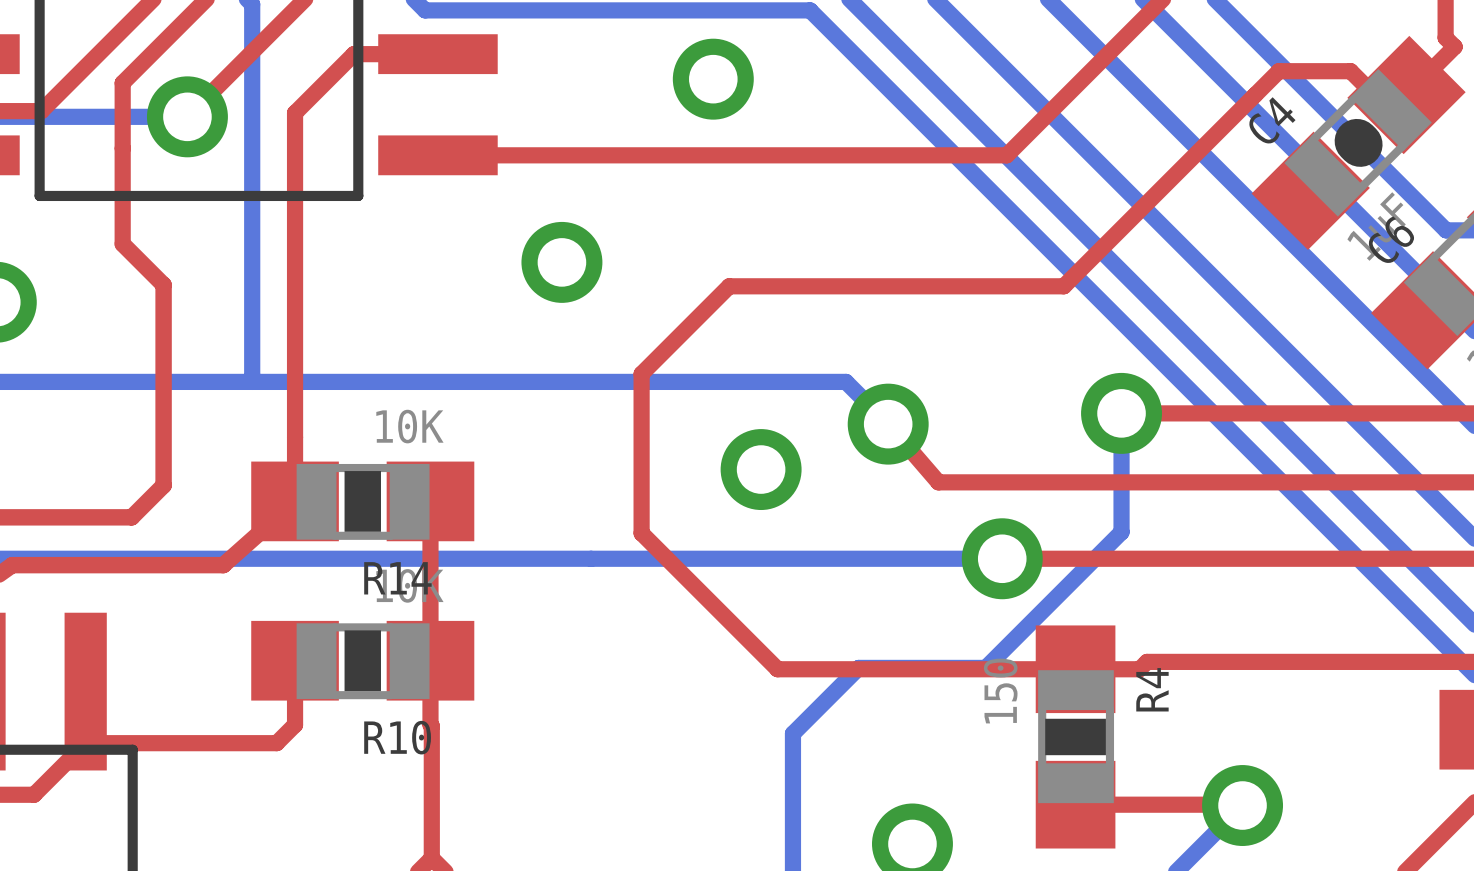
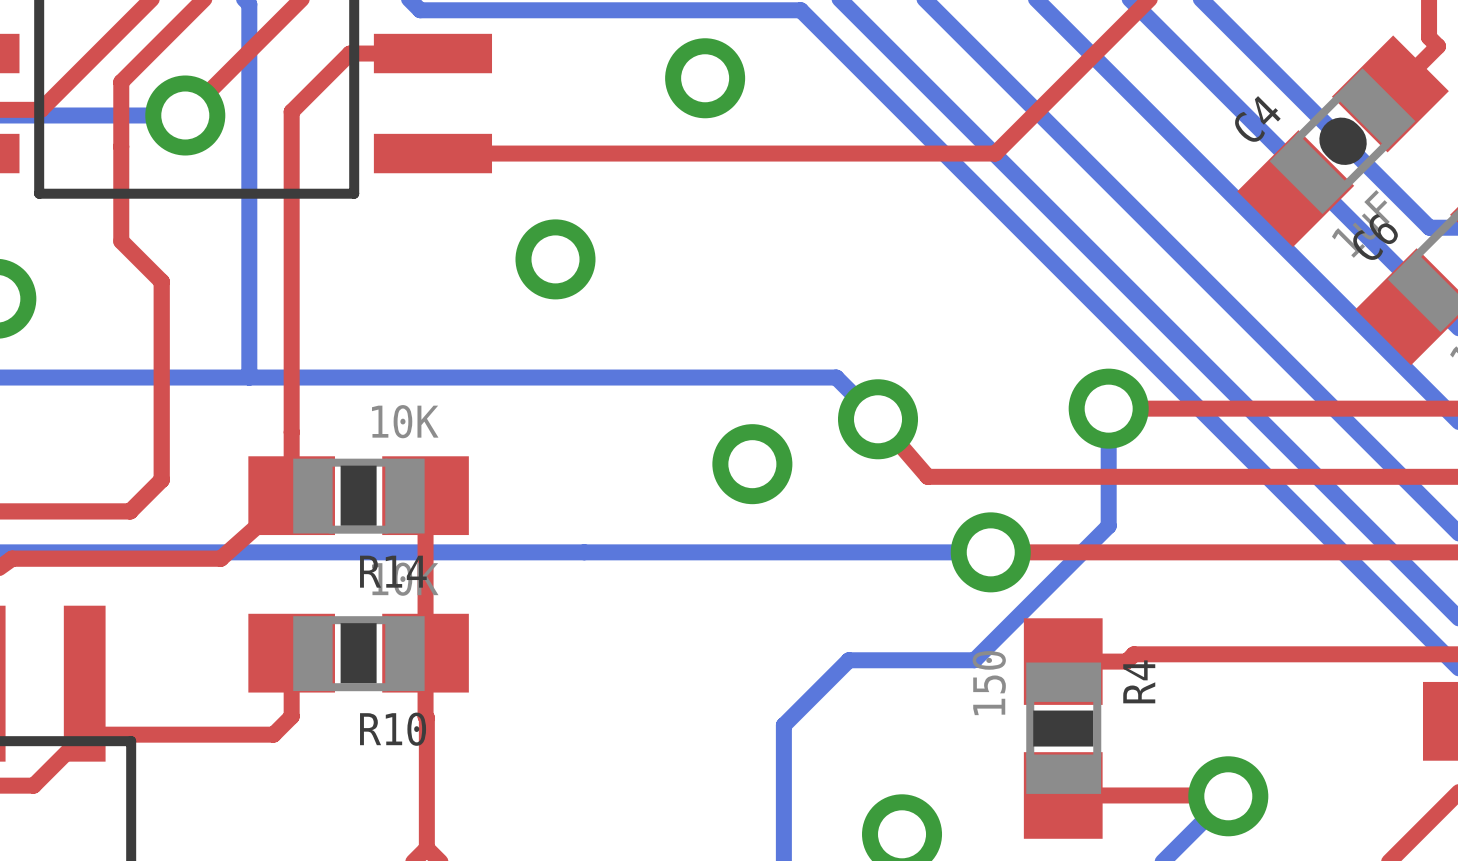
top track: (1374, 95) (1350, 71) (1278, 71) (1063, 286) (729, 286) (641, 373) (641, 533) (777, 669) (1075, 669) -> none

